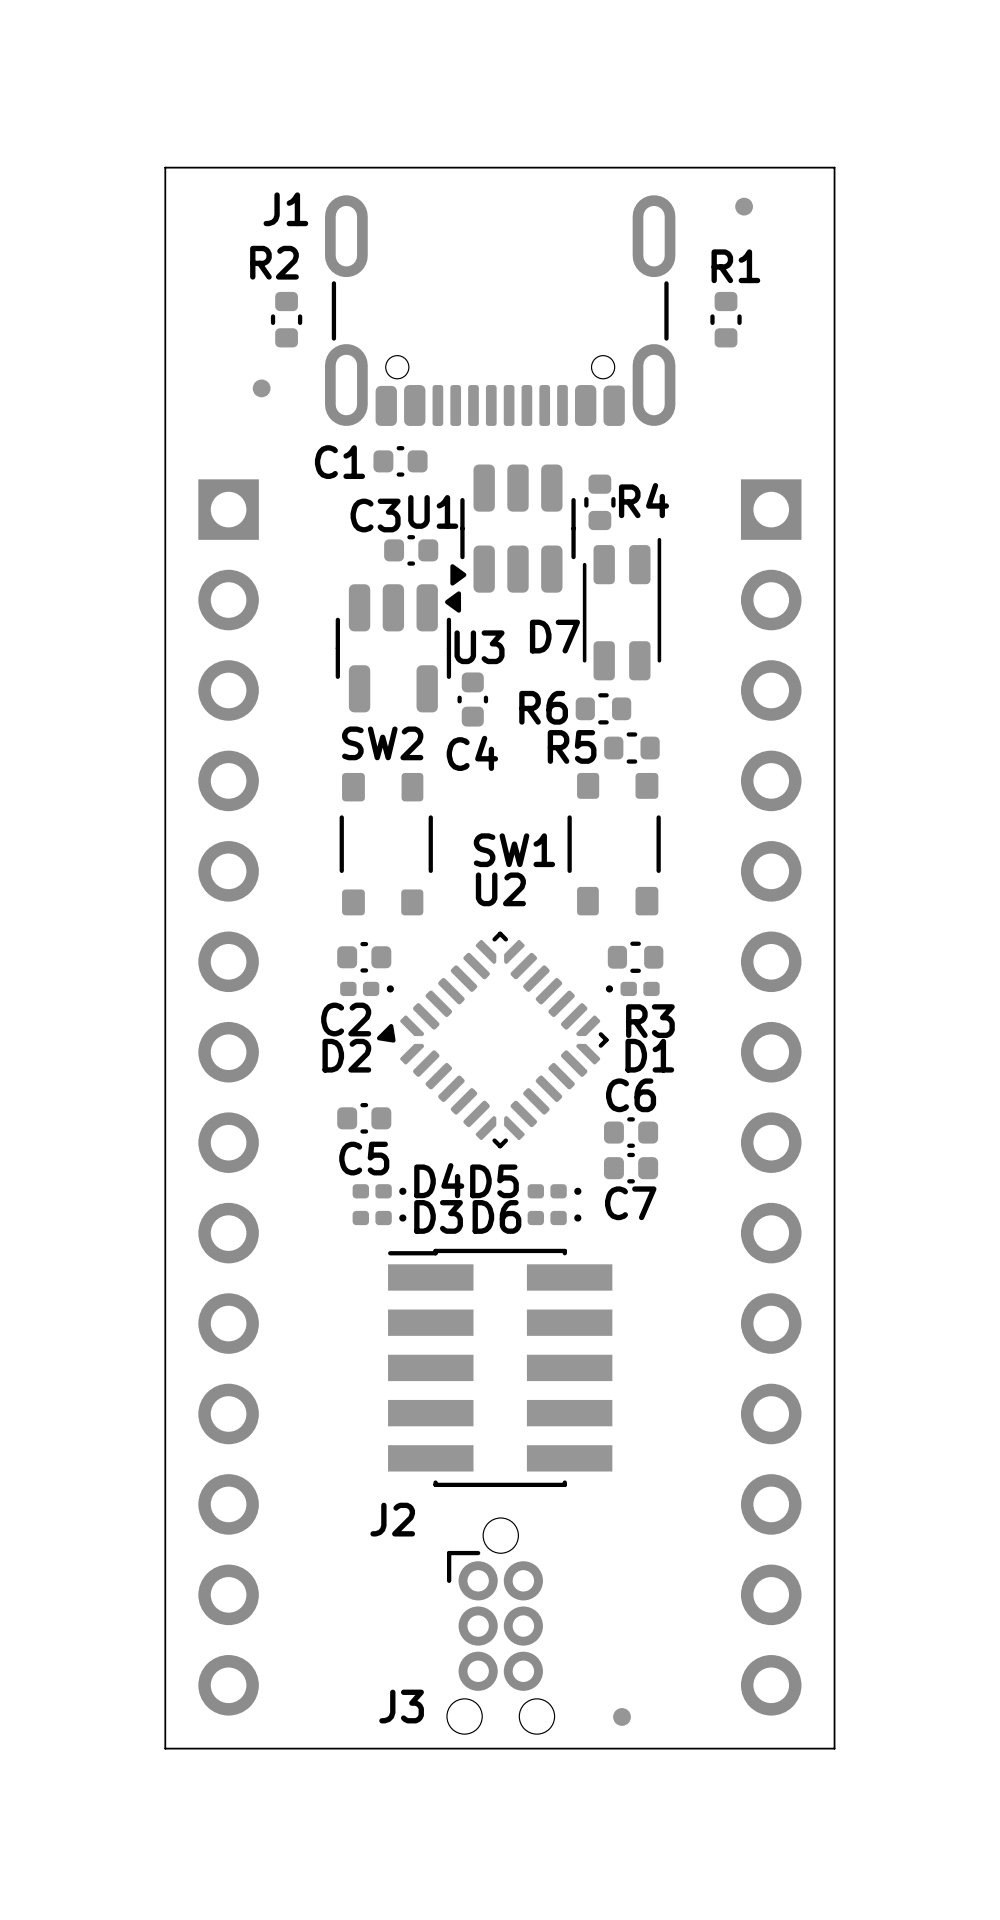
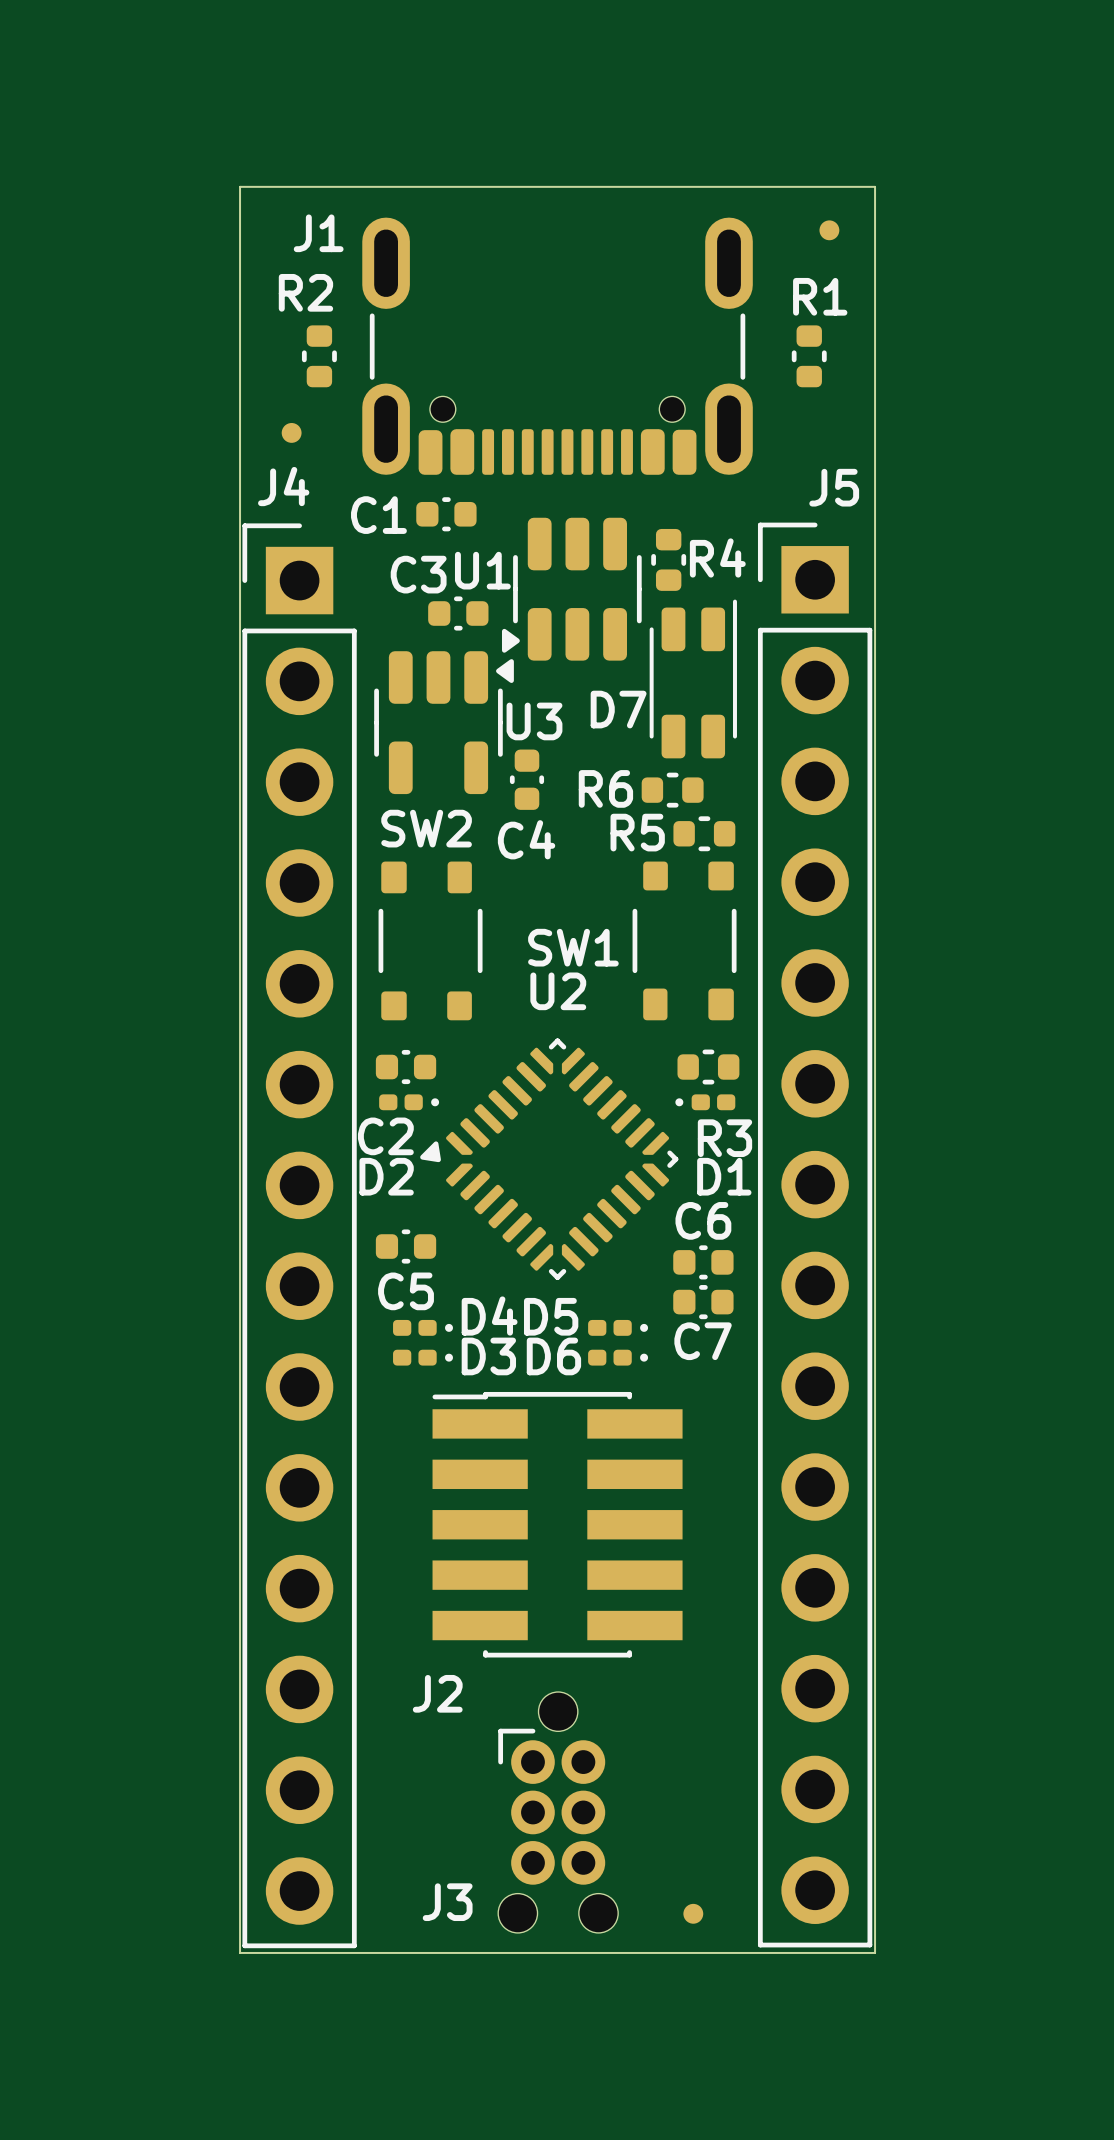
board edge: (215, 167) (165, 167) (165, 1748) (834, 1748) (834, 167) (785, 167) -> (240, 186) (240, 1952) (875, 1952) (875, 186)
J4 side: bottom (228, 1097) -> top (299, 1235)
J5 side: bottom (771, 1097) -> top (815, 1235)

